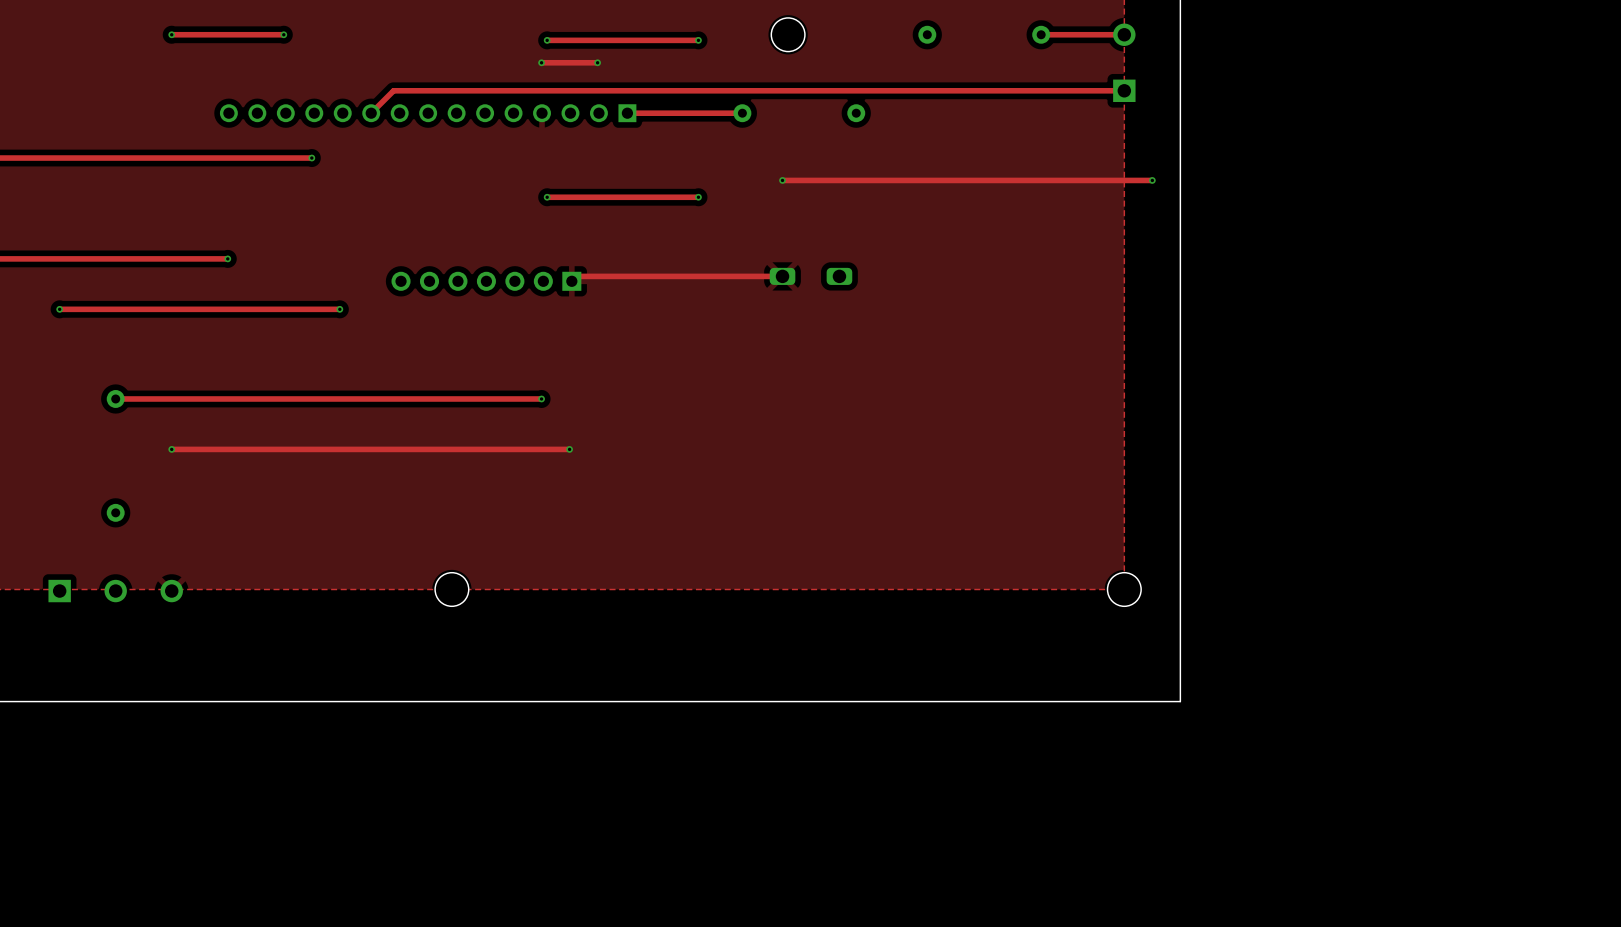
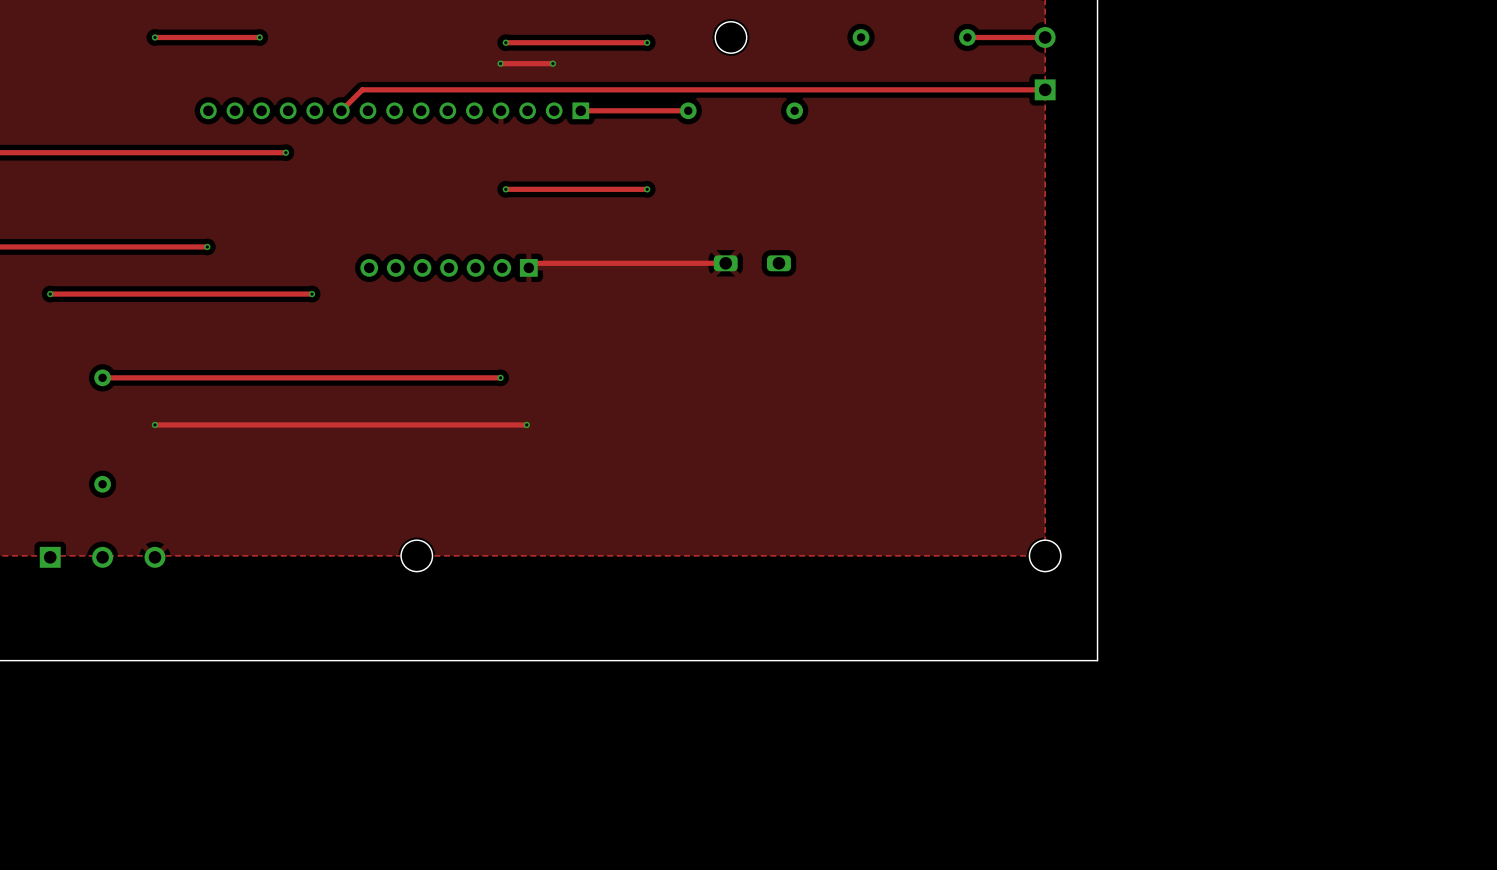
track: (782, 180) (1152, 180) -> none
via: (782, 180) -> none
via: (1152, 180) -> none

